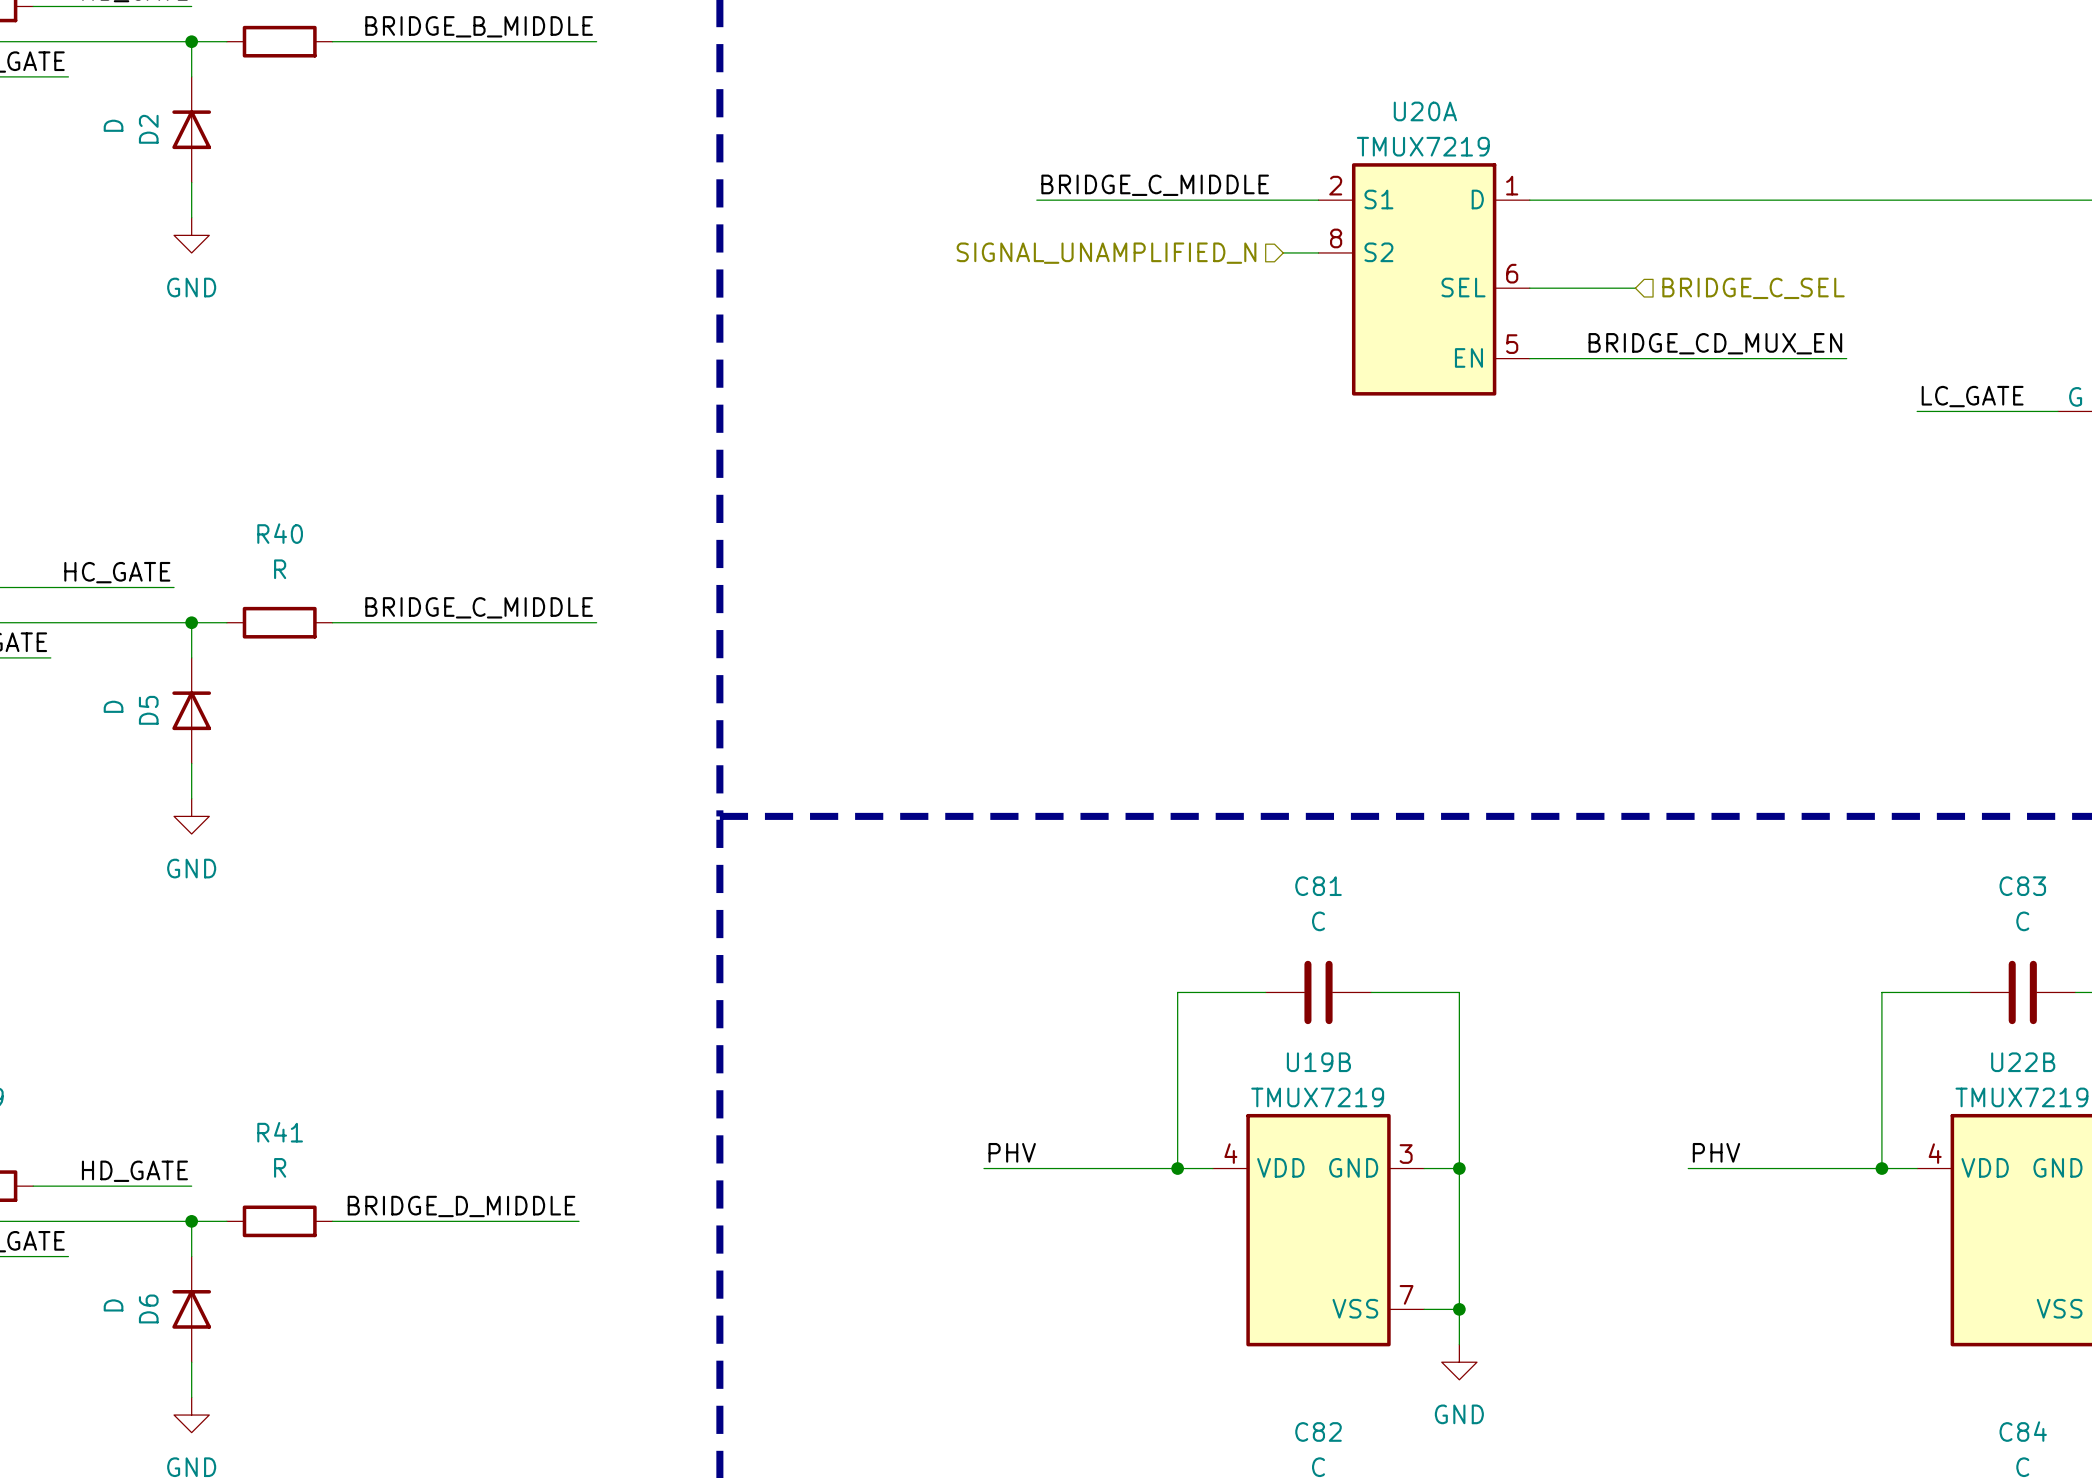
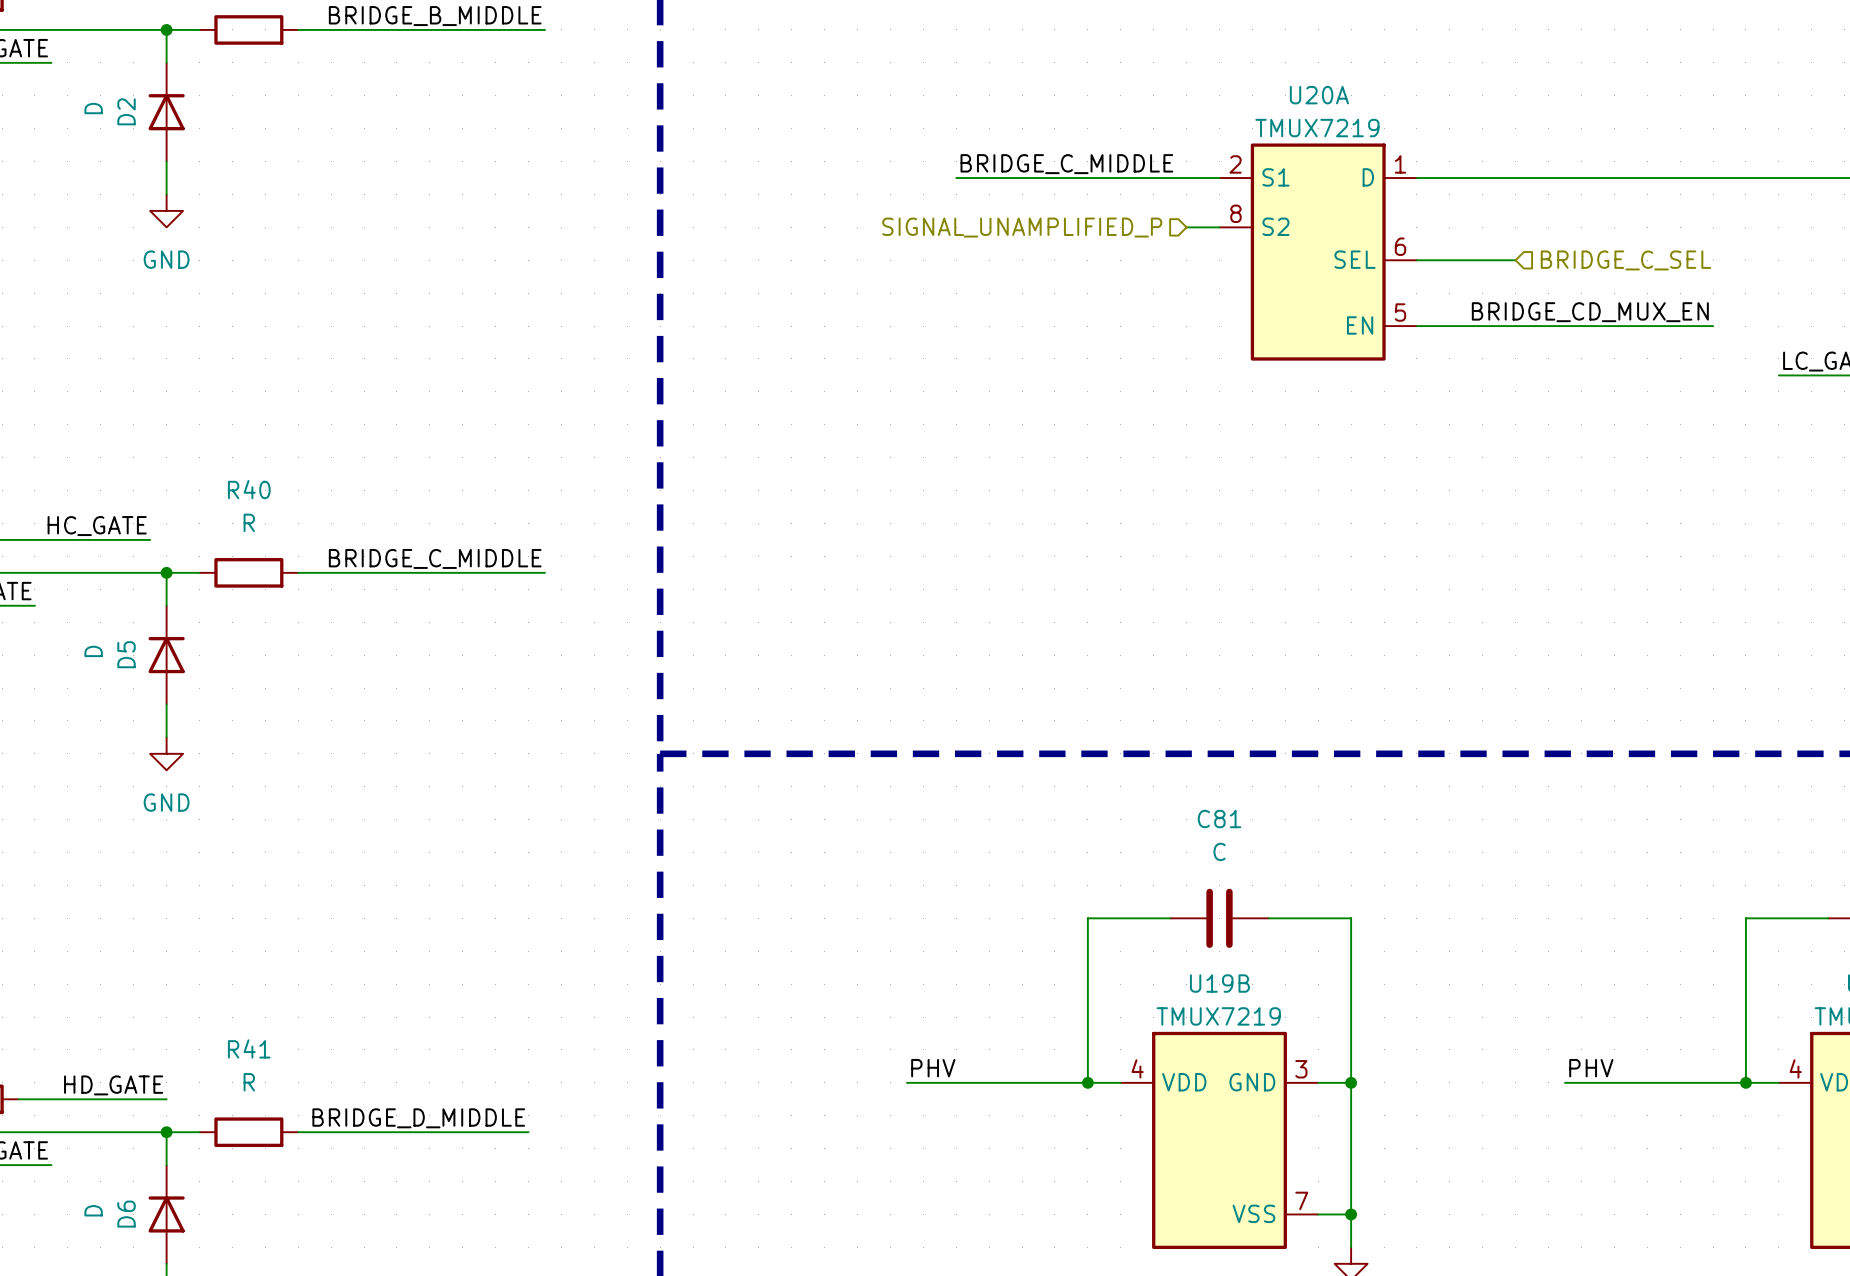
hierarchical label: SIGNAL_UNAMPLIFIED_N (1106, 253) -> SIGNAL_UNAMPLIFIED_P (1022, 227)

